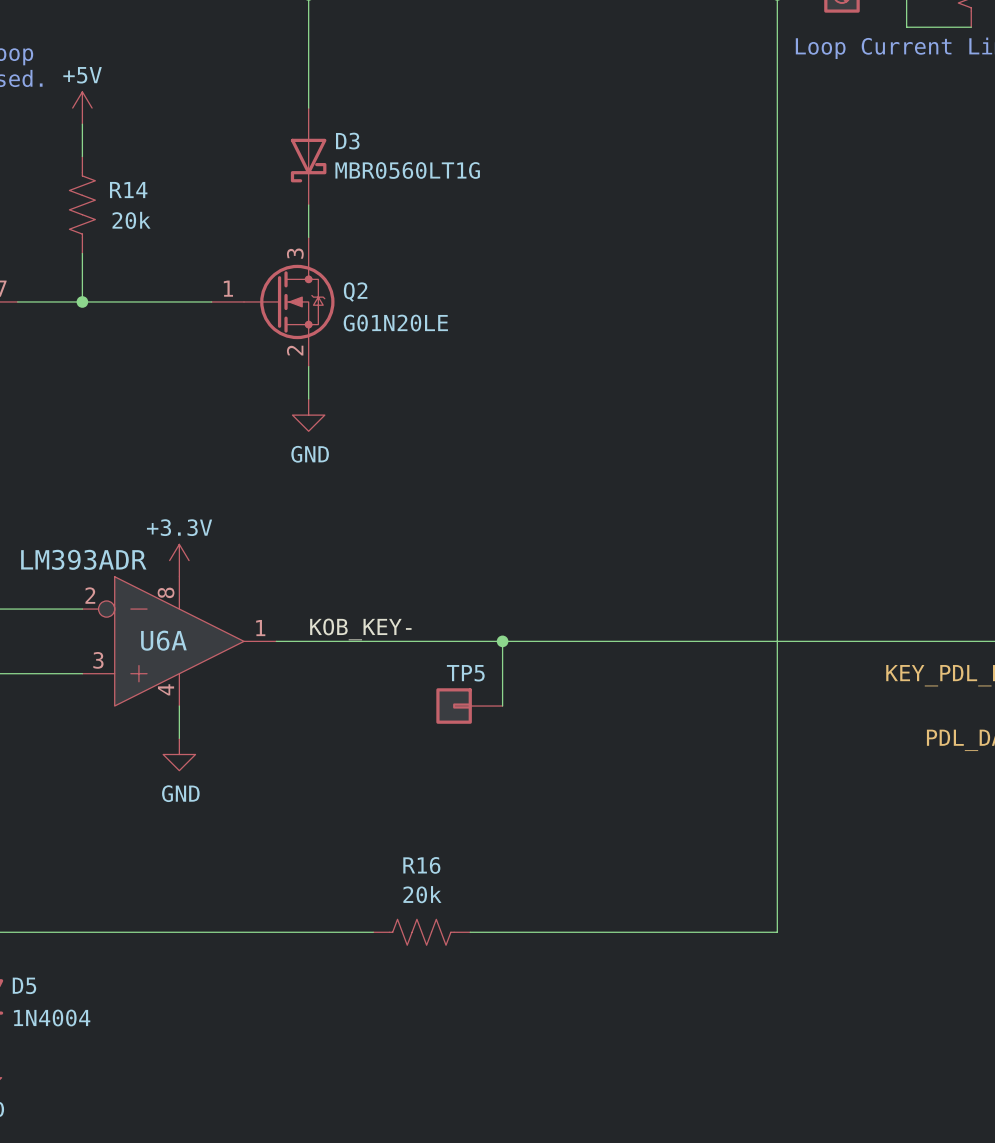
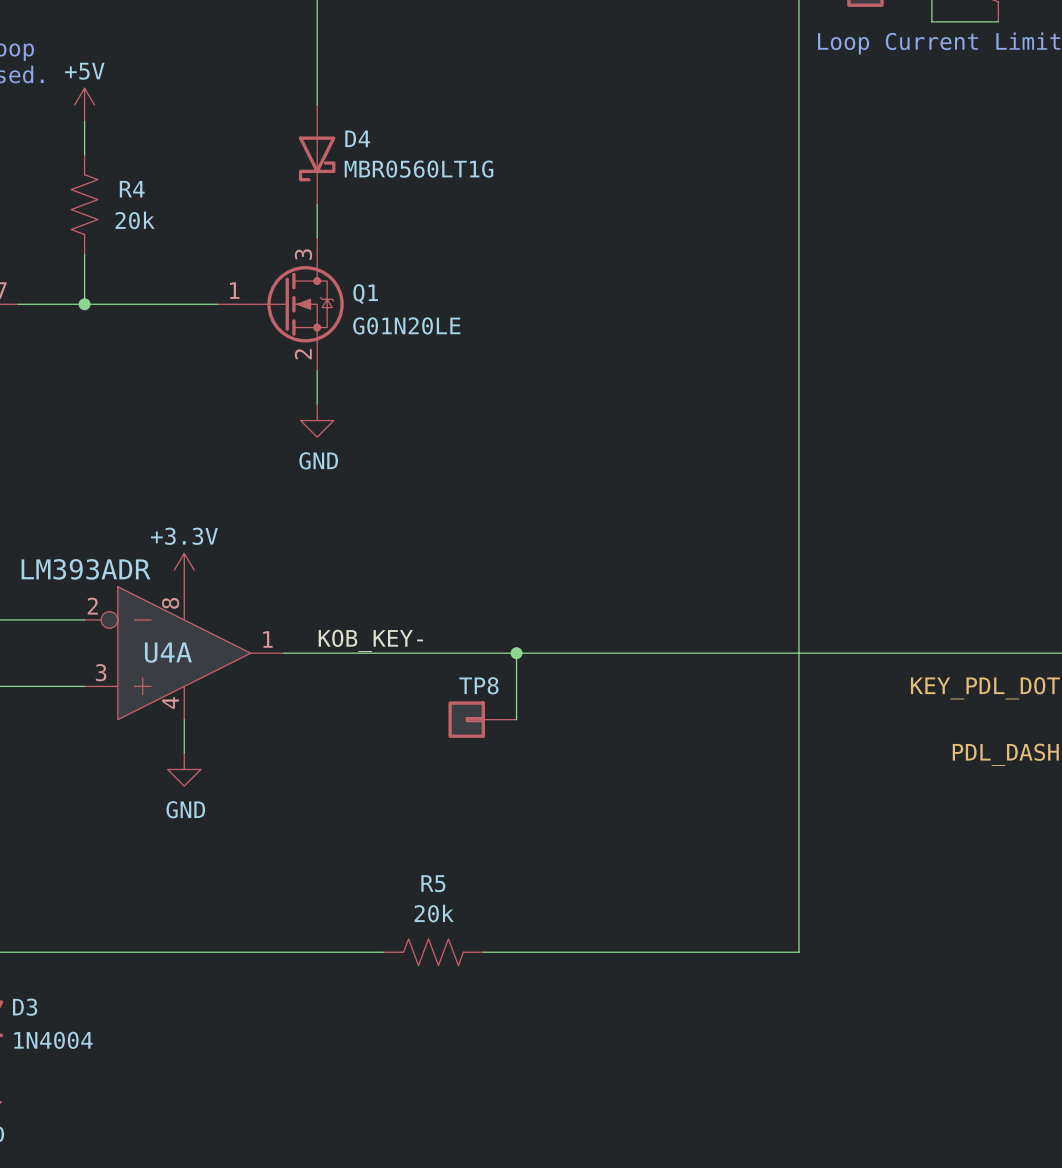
D3 name: D3 (347, 141) -> D4 (357, 138)
R14 name: R14 (128, 190) -> R4 (132, 189)
Q2 name: Q2 (355, 292) -> Q1 (365, 294)
U6A name: U6A (163, 640) -> U4A (168, 652)
TP5 name: TP5 (465, 673) -> TP8 (478, 685)
R16 name: R16 (421, 865) -> R5 (433, 883)
D5 name: D5 (24, 985) -> D3 (25, 1007)

